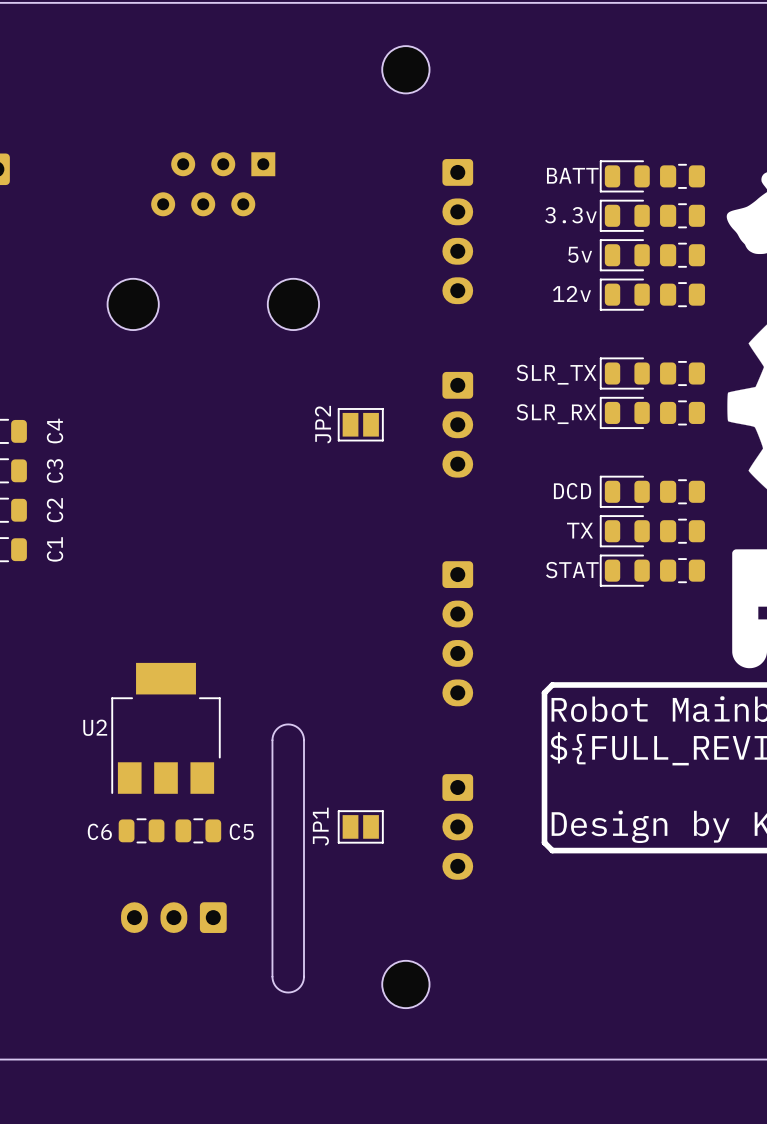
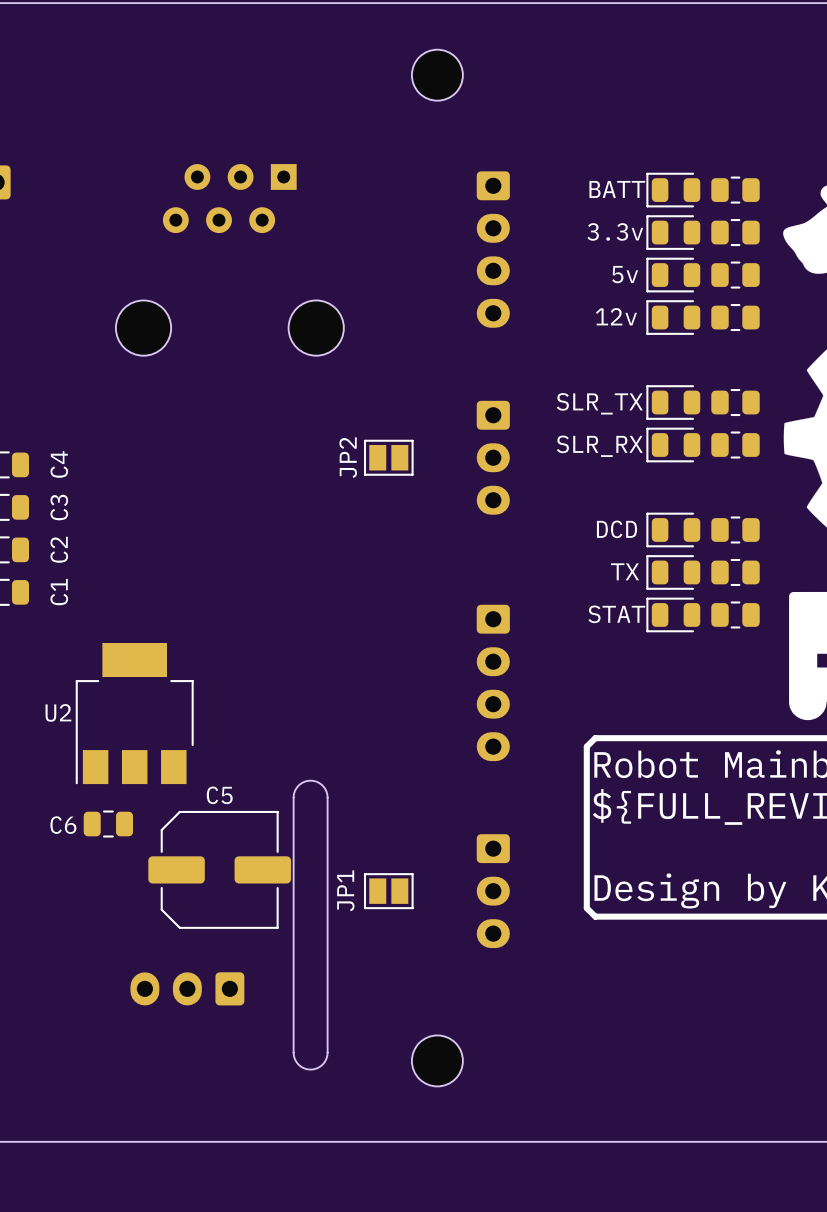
U2 position: (166, 728) -> (134, 713)
C5 footprint: [175, 818, 222, 844] -> [148, 810, 292, 929]
C6 position: (141, 830) -> (108, 824)
C5 name position: C5 (241, 831) -> C5 (219, 795)

